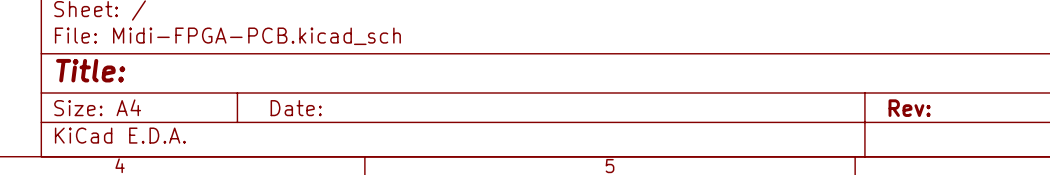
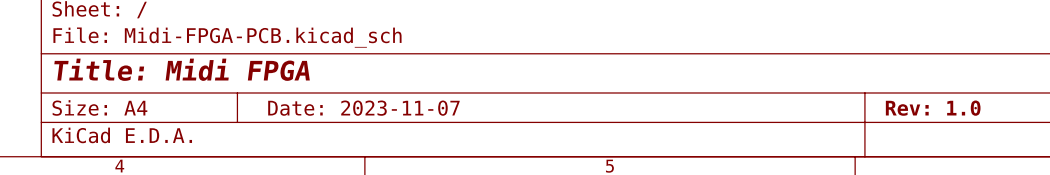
title block: Title: (90, 70) -> Title: Midi FPGA (182, 69)
title block: Date: (296, 108) -> Date: 2023-11-07 (363, 108)
title block: Rev: (909, 108) -> Rev: 1.0 (933, 108)

